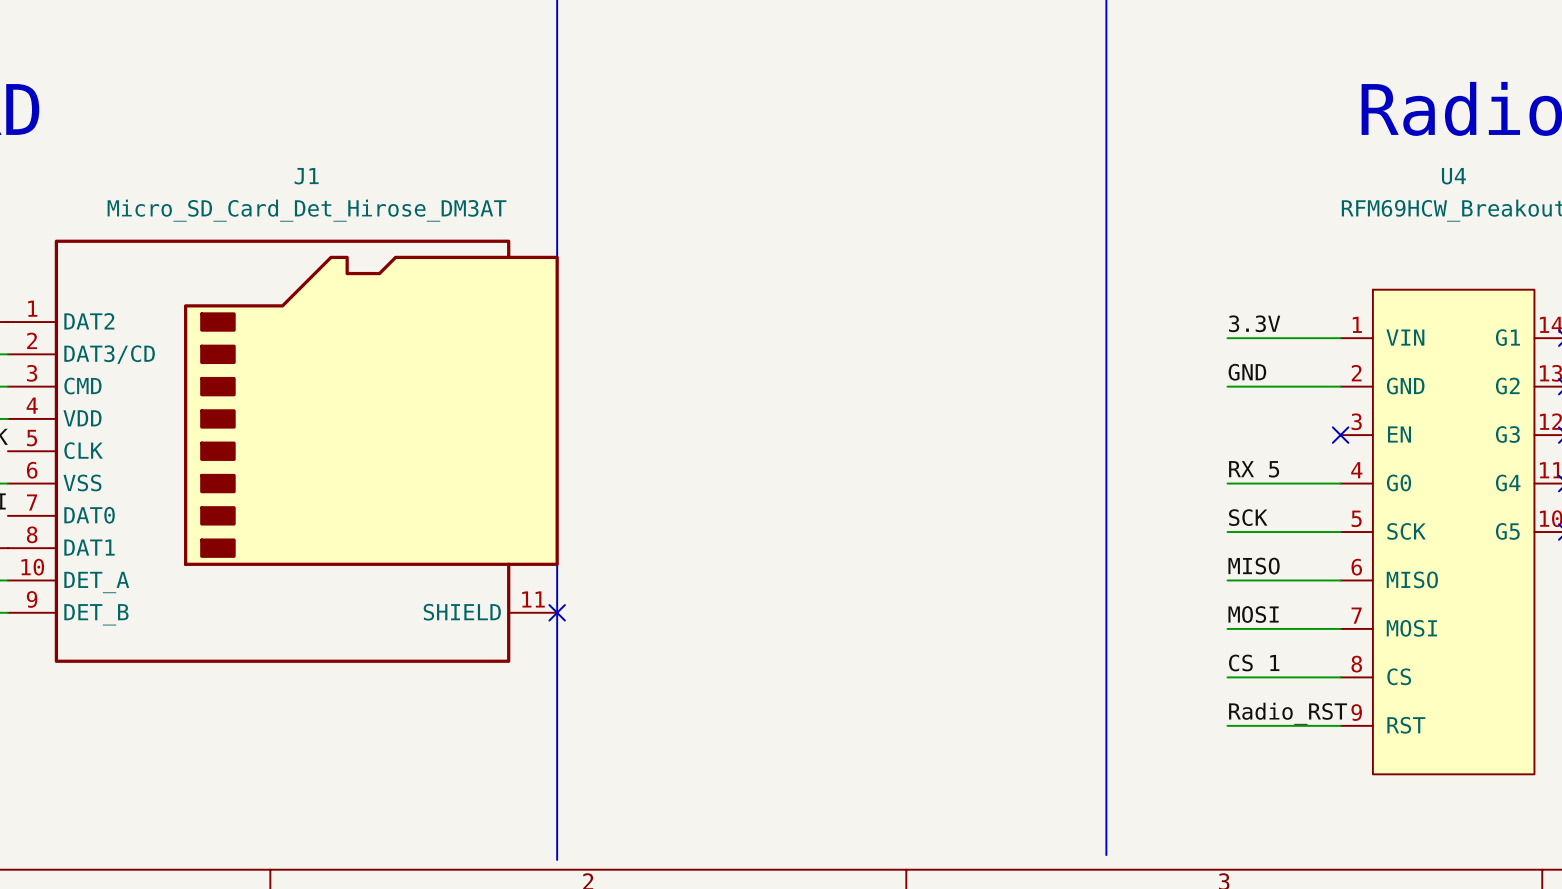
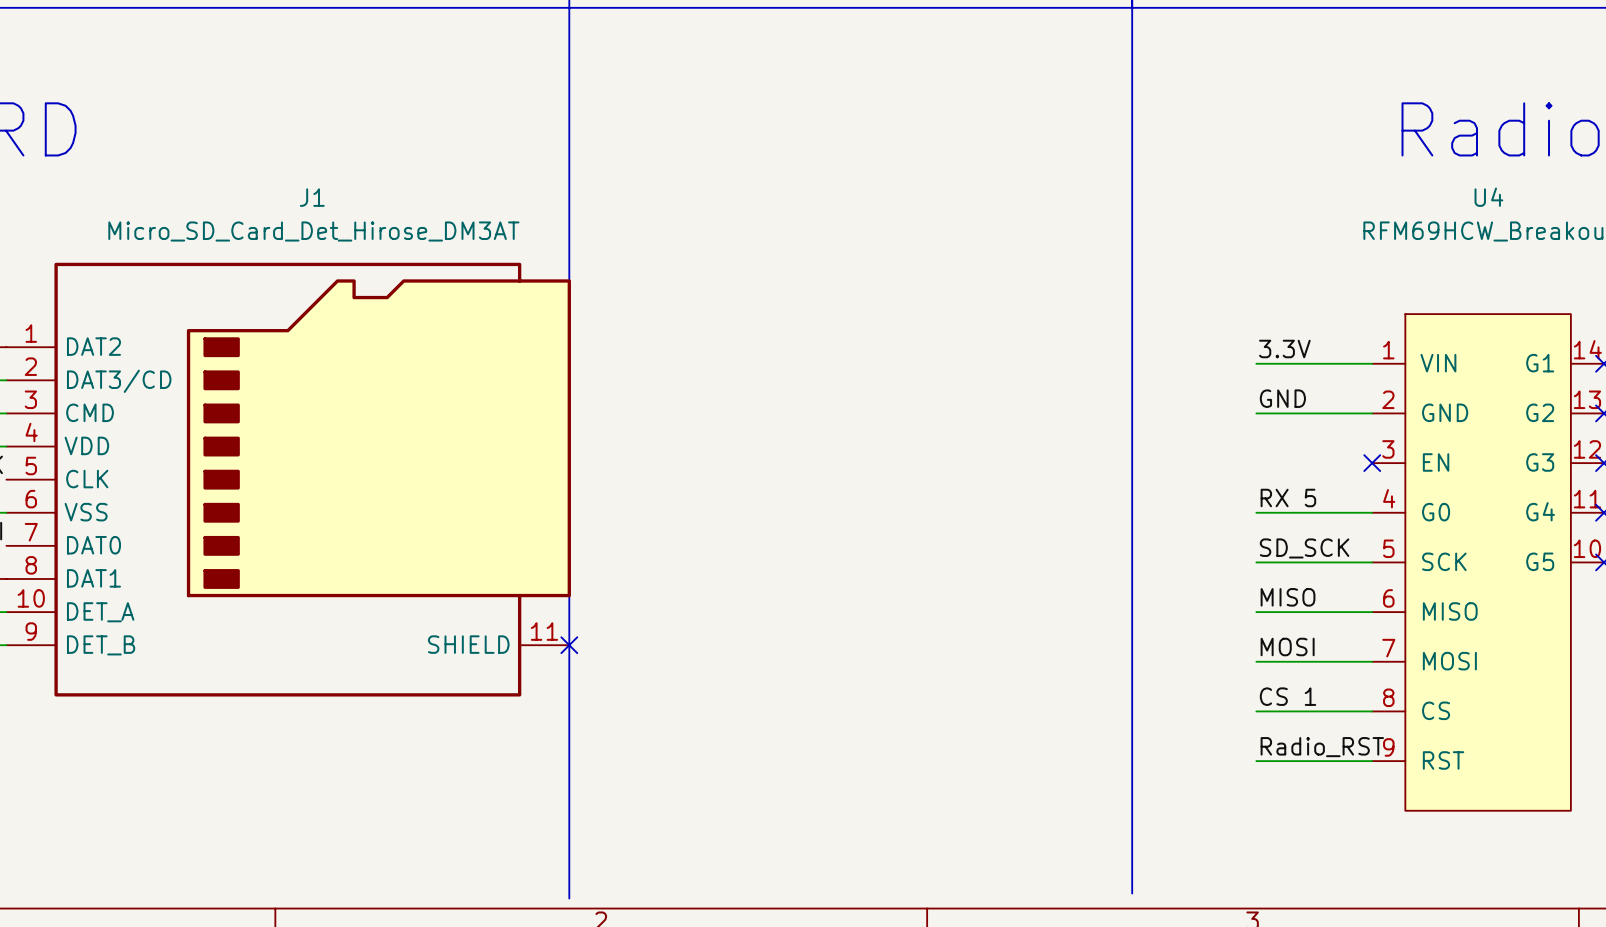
label: SCK (1248, 517) -> SD_SCK (1304, 548)

